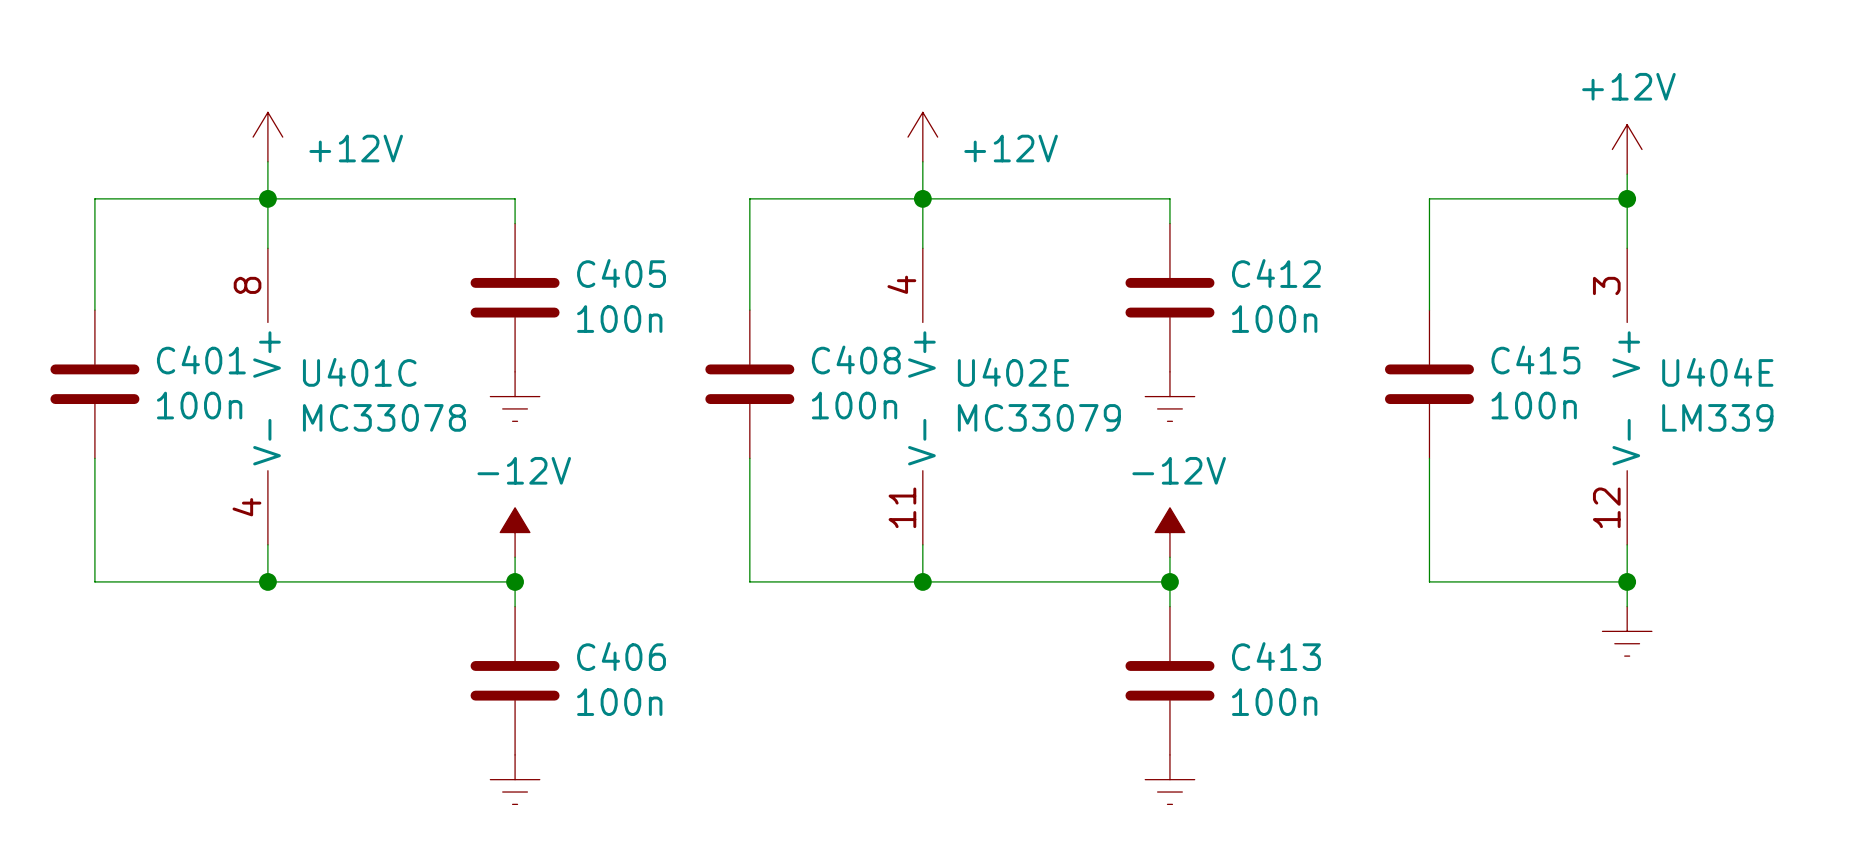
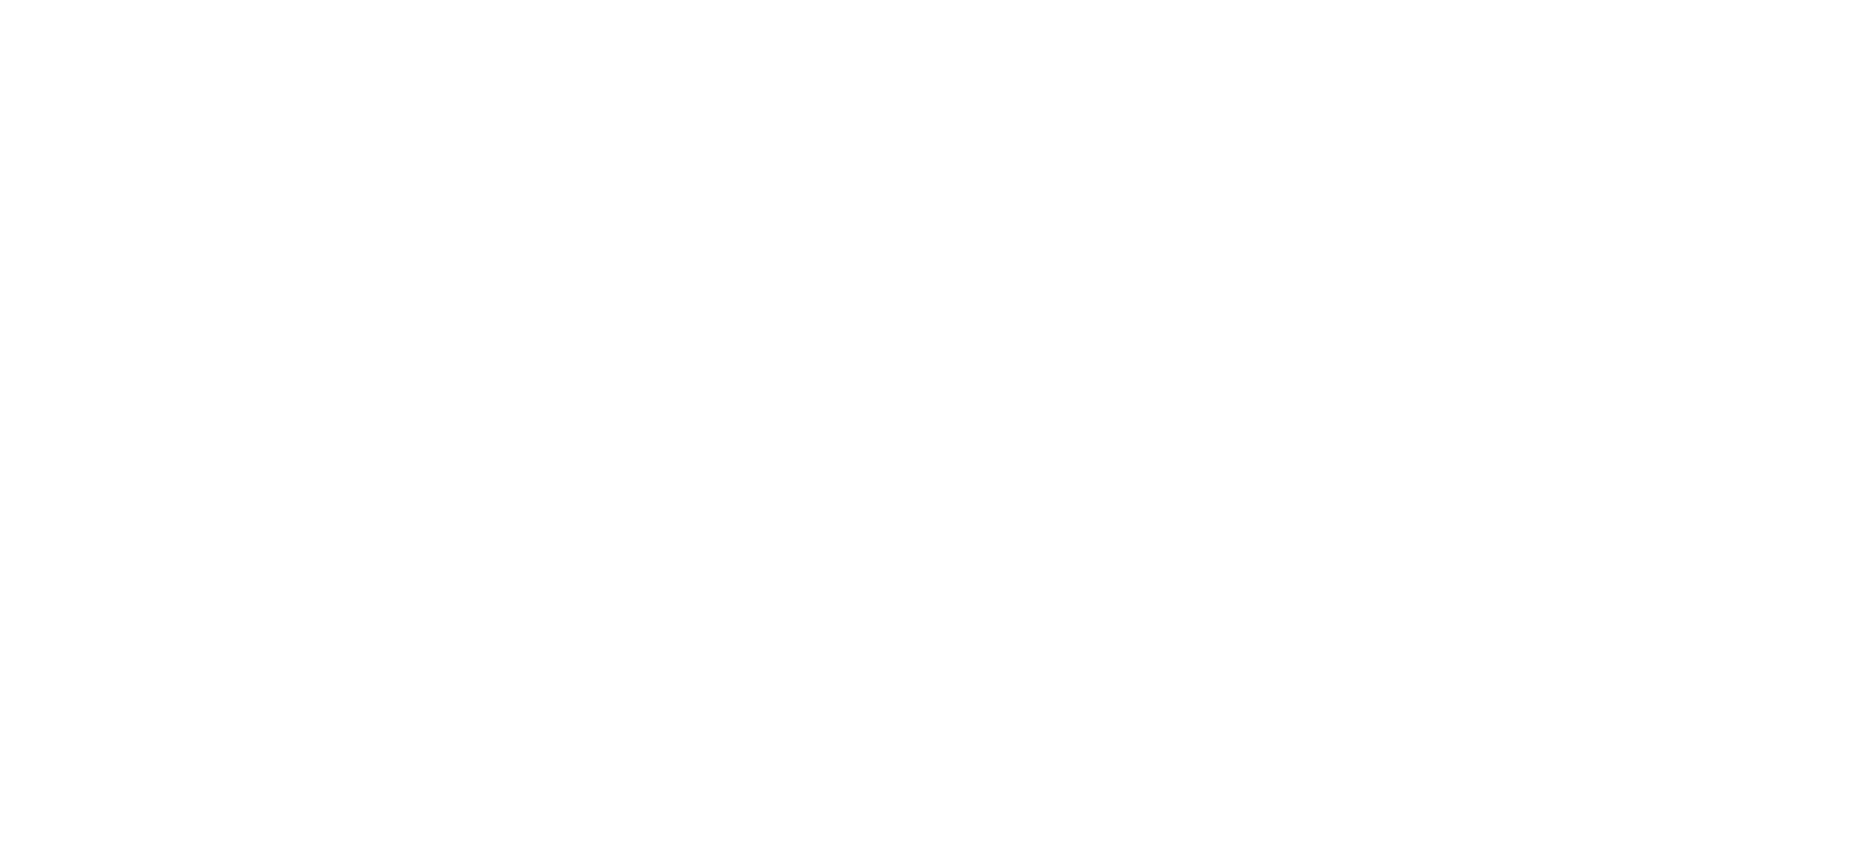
power symbol: +12V (267, 137) -> none
power symbol: +12V (922, 137) -> none
power symbol: +12V (1627, 149) -> none
wire: (267, 161) (267, 248) -> none
wire: (922, 161) (922, 248) -> none
wire: (1627, 174) (1627, 248) -> none
junction: (267, 198) -> none
junction: (922, 198) -> none
wire: (1627, 198) (1429, 198) (1429, 310) -> none
junction: (1627, 198) -> none
wire: (515, 223) (515, 198) (94, 198) (94, 310) -> none
wire: (1169, 223) (1169, 198) (749, 198) (749, 310) -> none
C405: 100n (515, 297) -> none
C412: 100n (1169, 297) -> none
C401: 100n (94, 384) -> none
C408: 100n (749, 384) -> none
C415: 100n (1429, 384) -> none
U401C: MC33078 (267, 396) -> none
power symbol: (515, 396) -> none
U402E: MC33079 (922, 396) -> none
power symbol: (1169, 396) -> none
U404E: LM339 (1627, 396) -> none
wire: (94, 458) (94, 581) (515, 581) -> none
wire: (749, 458) (749, 581) (1169, 581) -> none
wire: (1429, 458) (1429, 581) (1627, 581) -> none
power symbol: -12V (515, 532) -> none
power symbol: -12V (1169, 532) -> none
wire: (267, 544) (267, 581) -> none
wire: (922, 544) (922, 581) -> none
wire: (1627, 544) (1627, 606) -> none
wire: (515, 557) (515, 606) -> none
wire: (1169, 557) (1169, 606) -> none
junction: (267, 581) -> none
junction: (515, 581) -> none
junction: (922, 581) -> none
junction: (1169, 581) -> none
junction: (1627, 581) -> none
power symbol: (1627, 631) -> none
C406: 100n (515, 680) -> none
C413: 100n (1169, 680) -> none
power symbol: (515, 779) -> none
power symbol: (1169, 779) -> none

